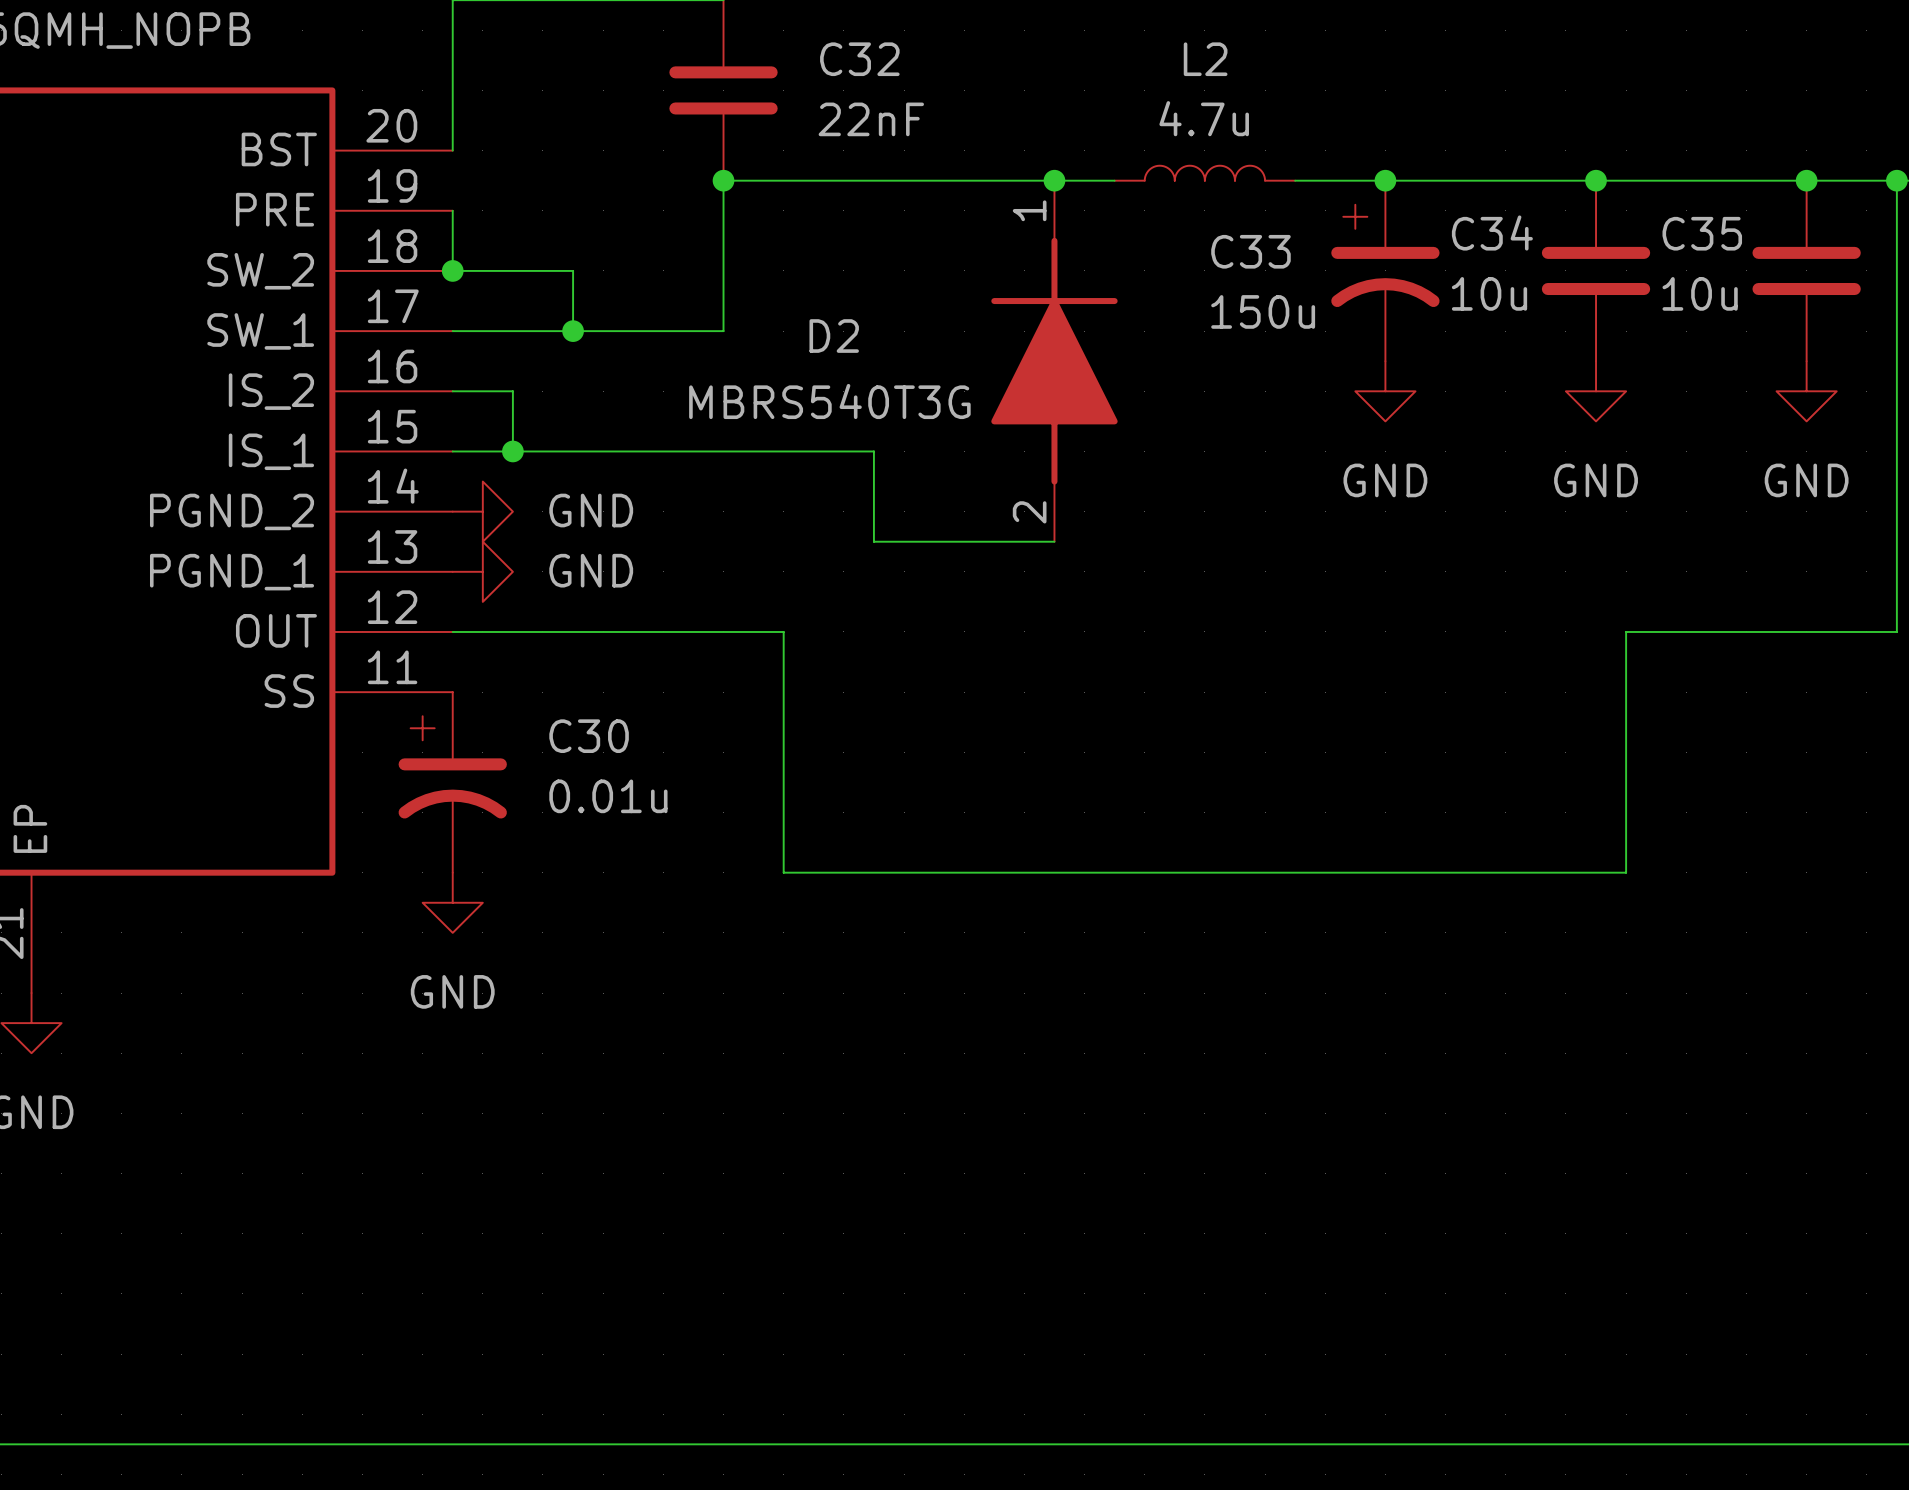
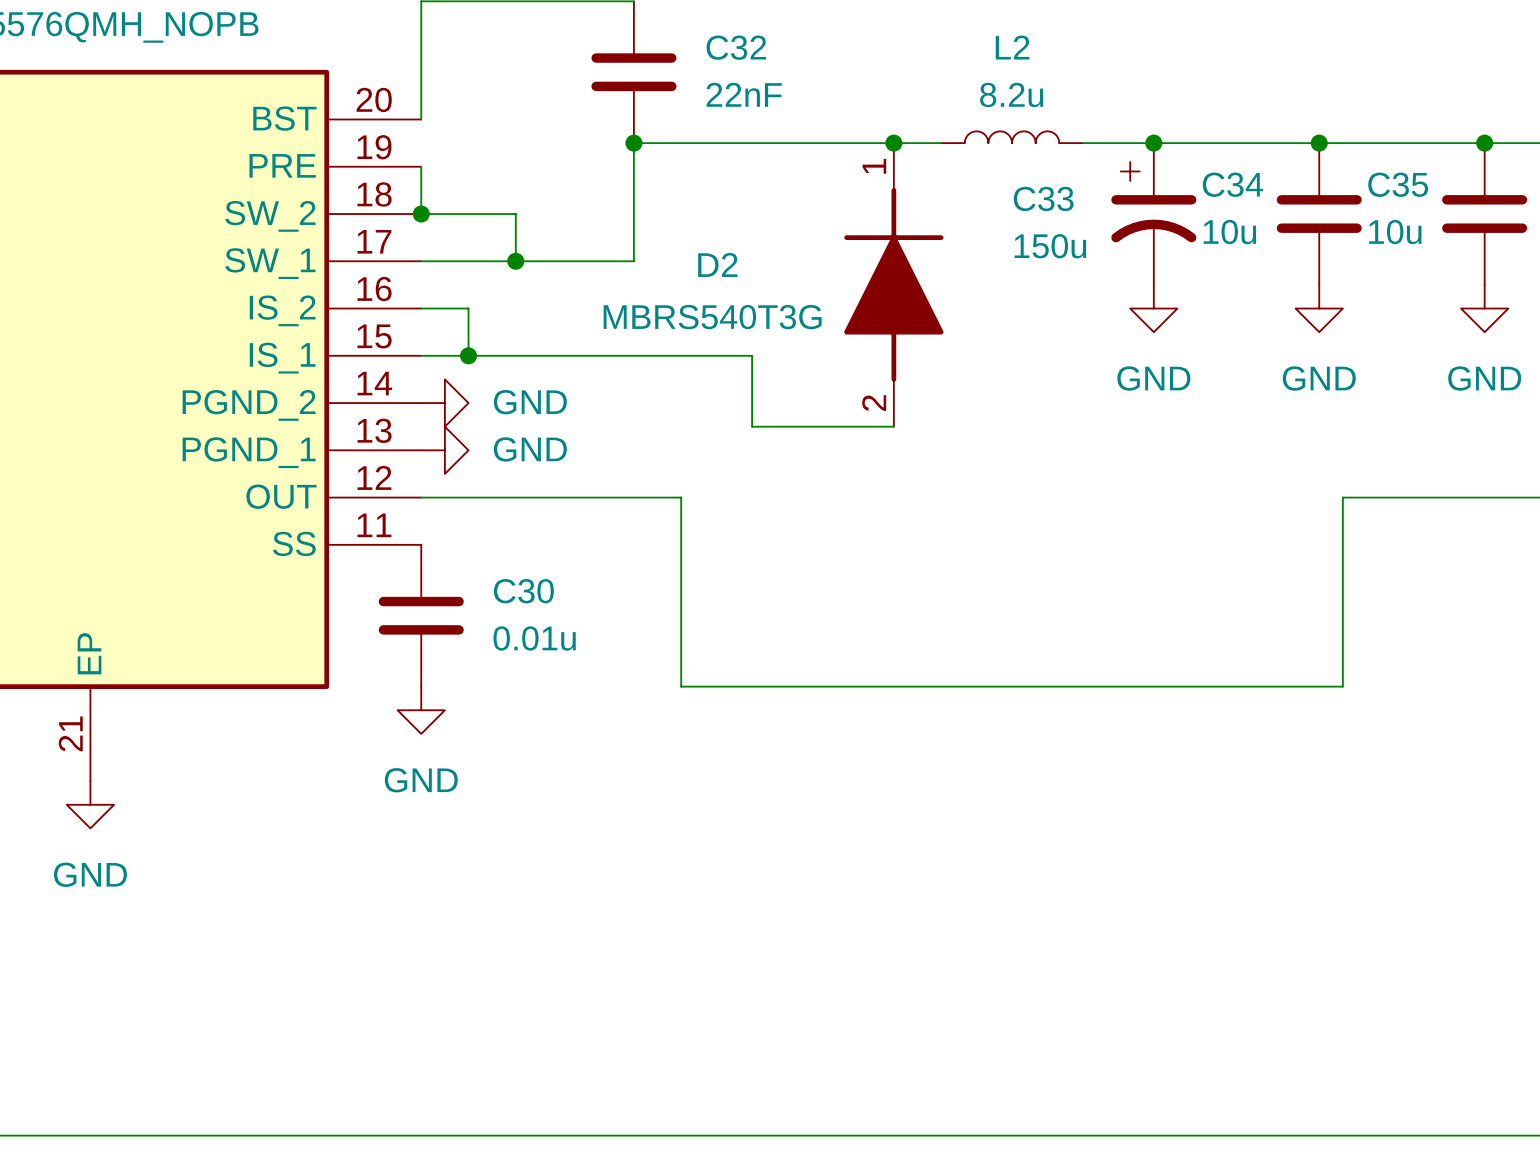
L2 value: 4.7u (1204, 118) -> 8.2u (1011, 94)
C30 symbol: [398, 692, 507, 873] -> [378, 544, 464, 687]

